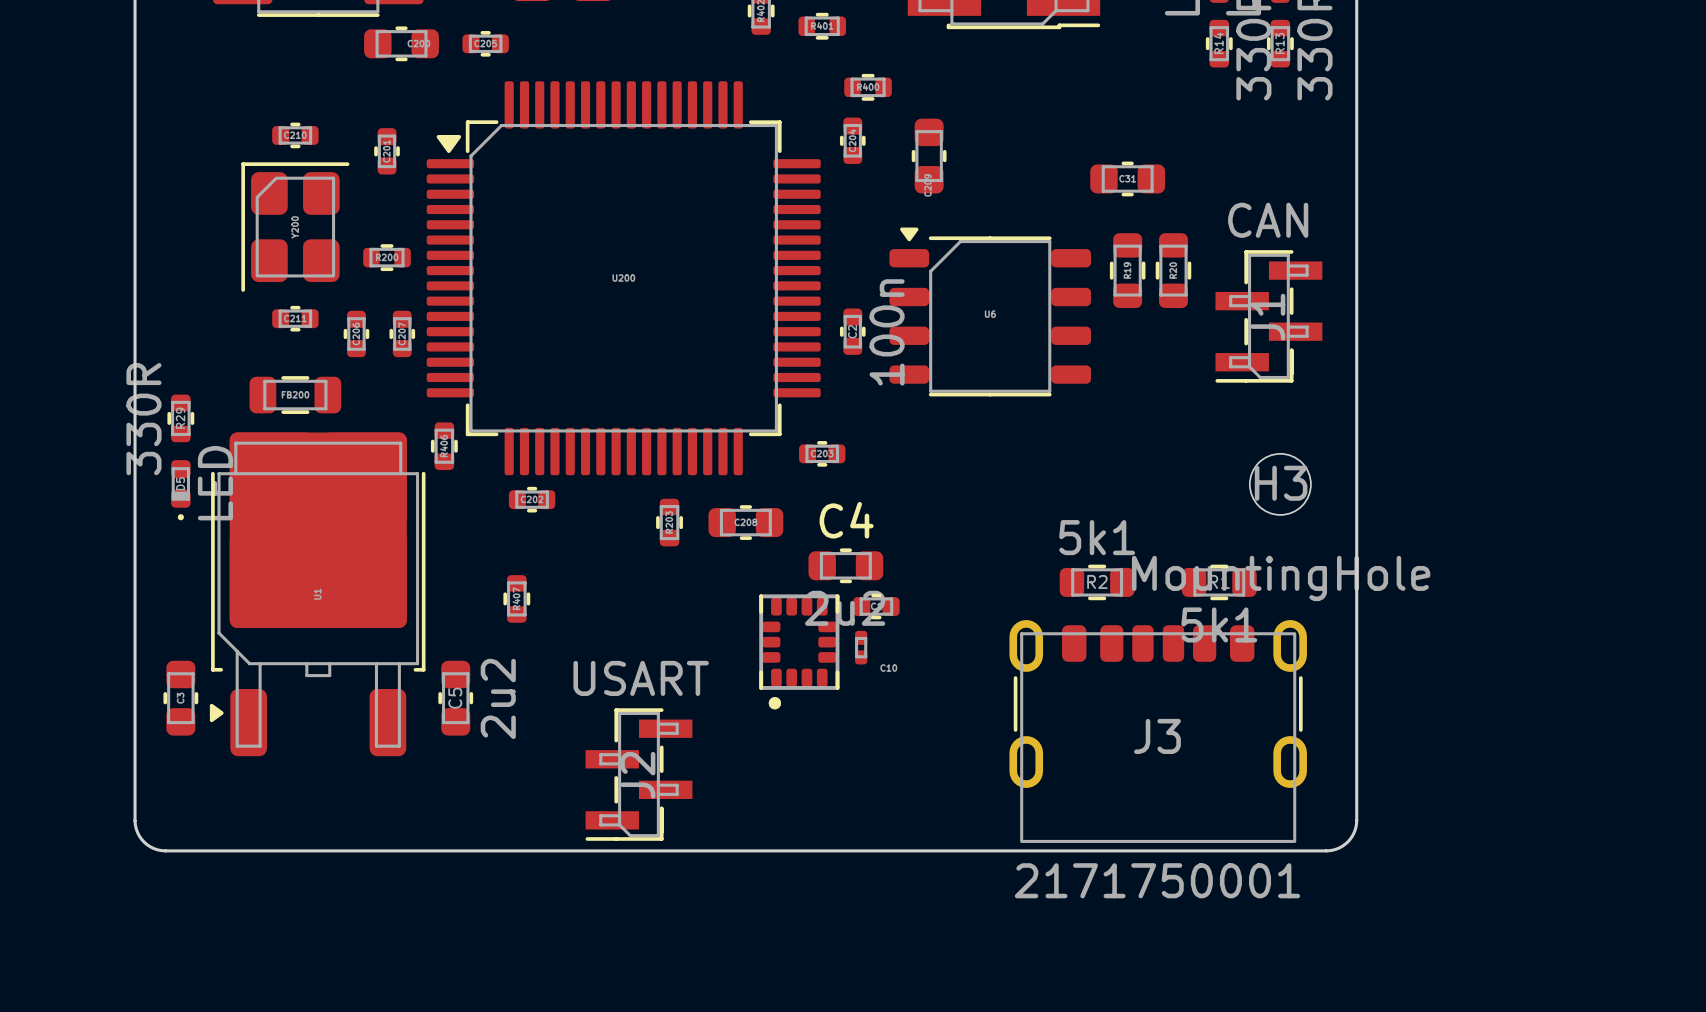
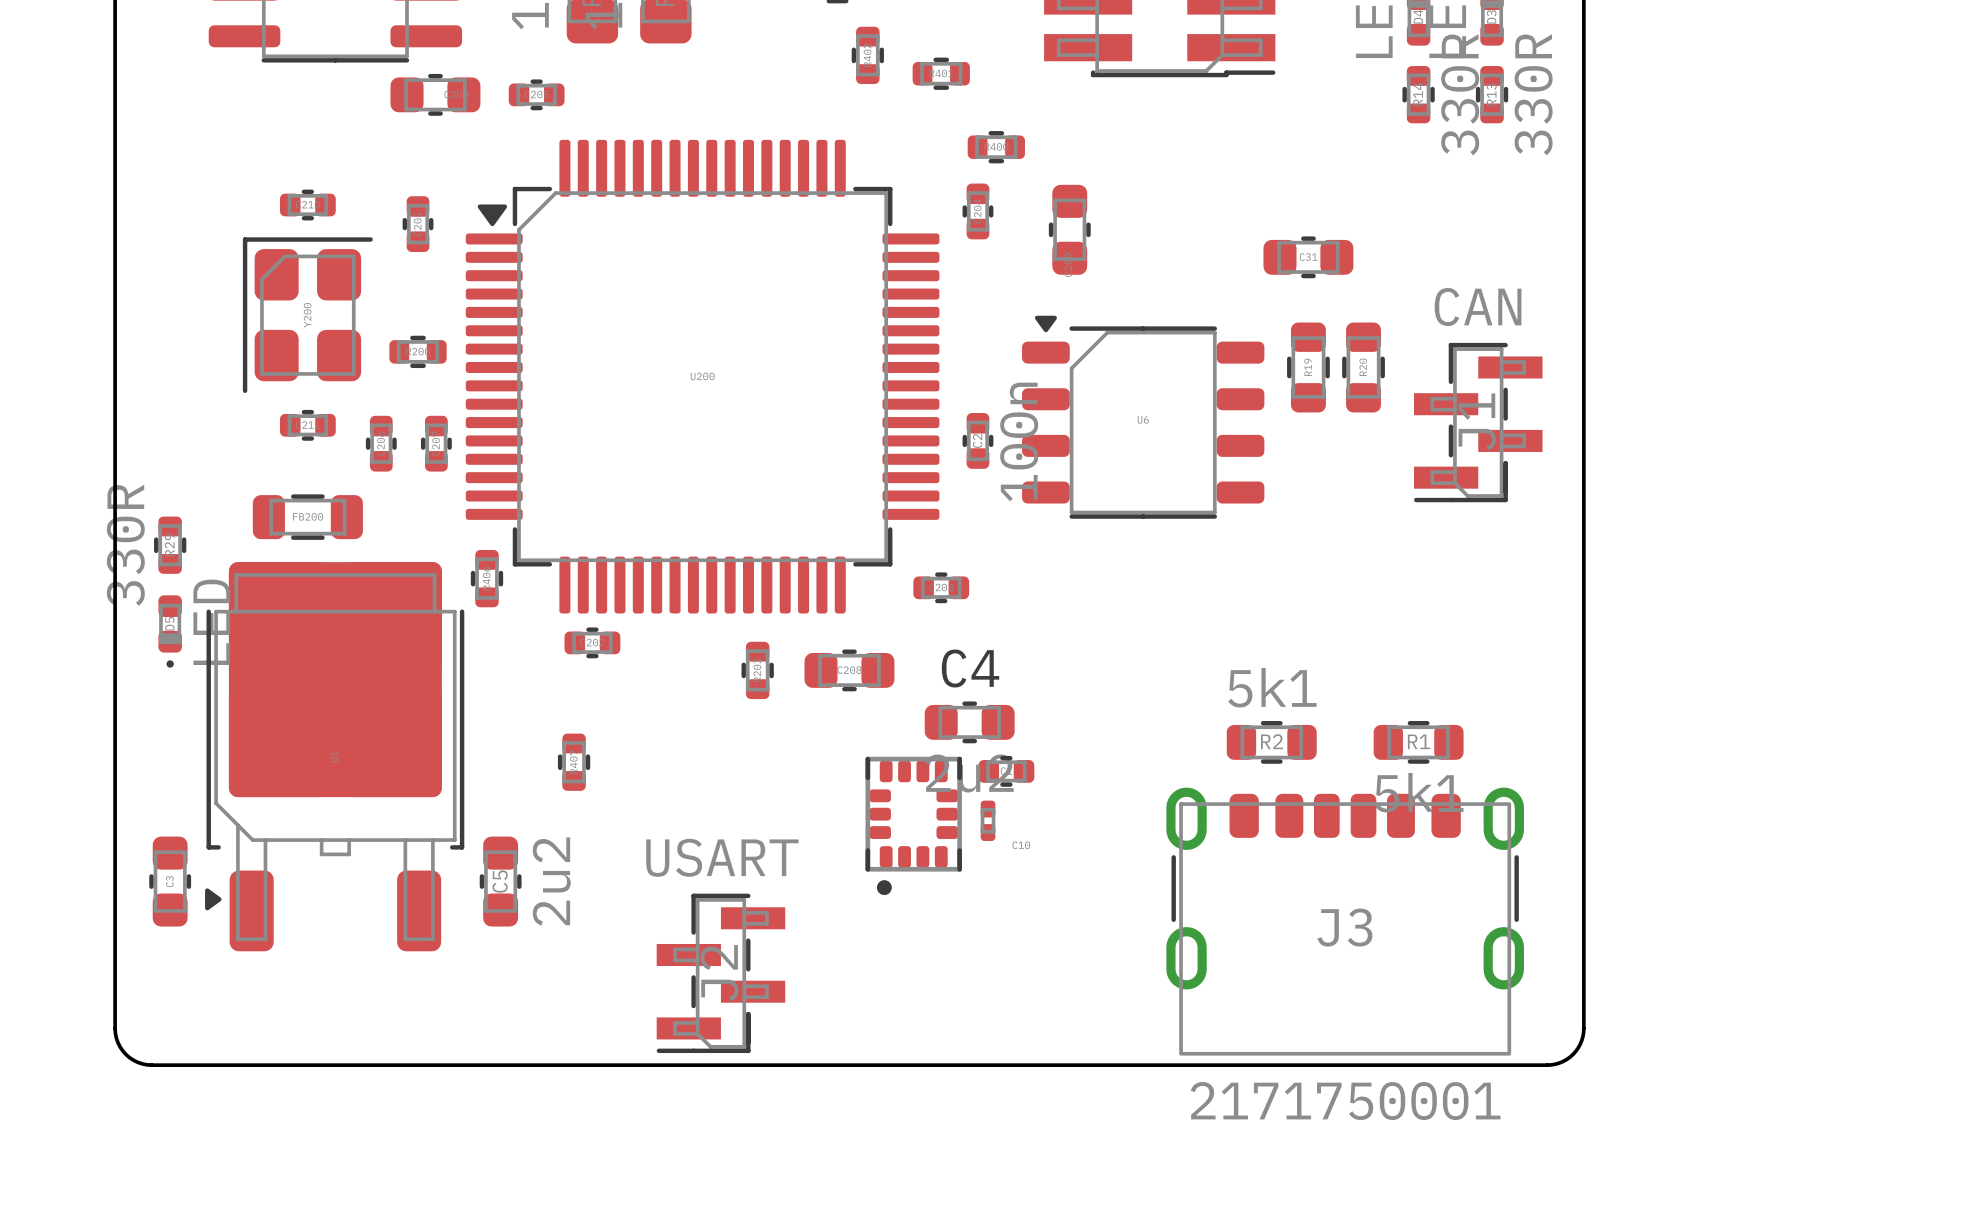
H3: MountingHole (1280, 484) -> none

